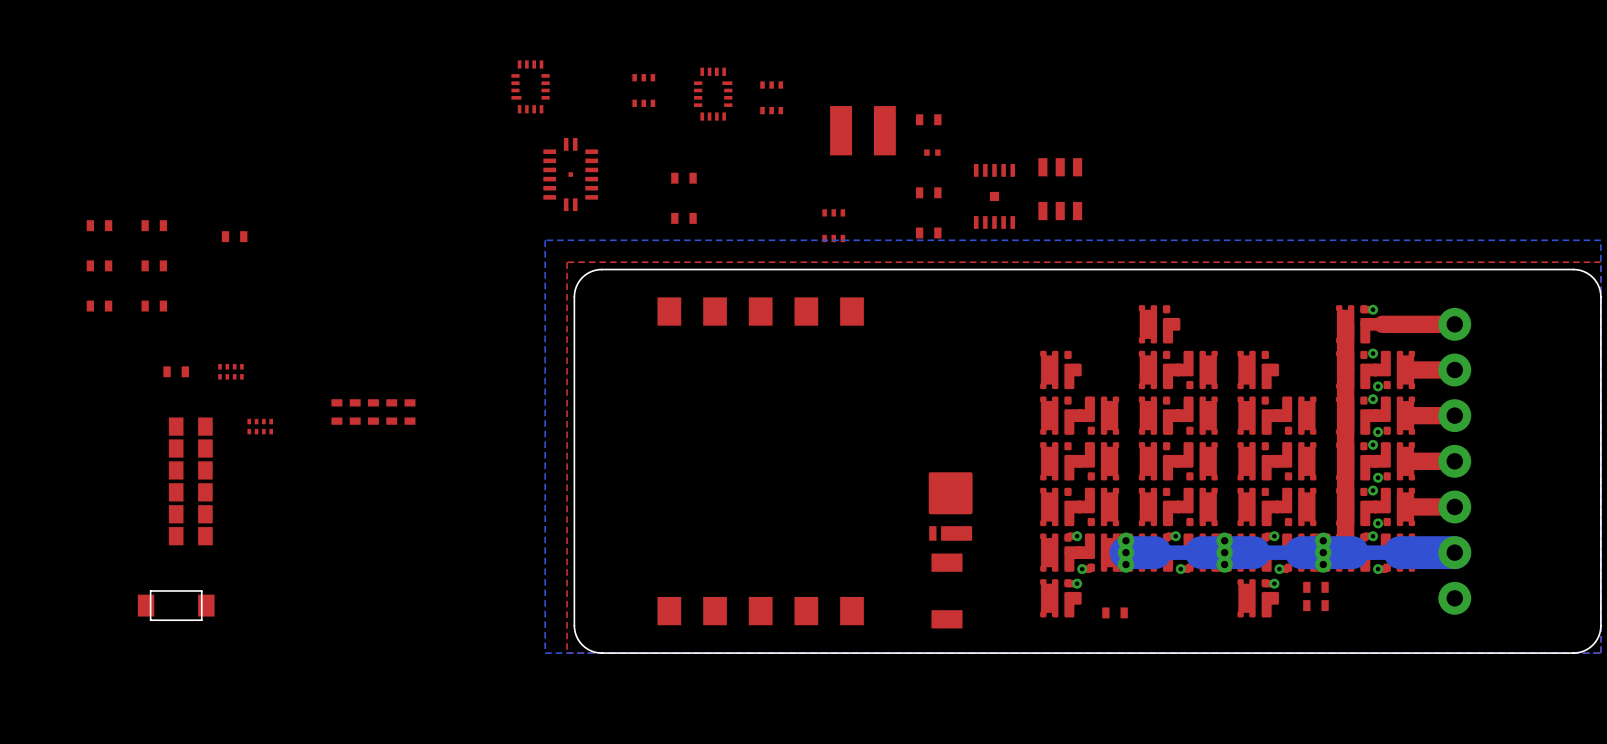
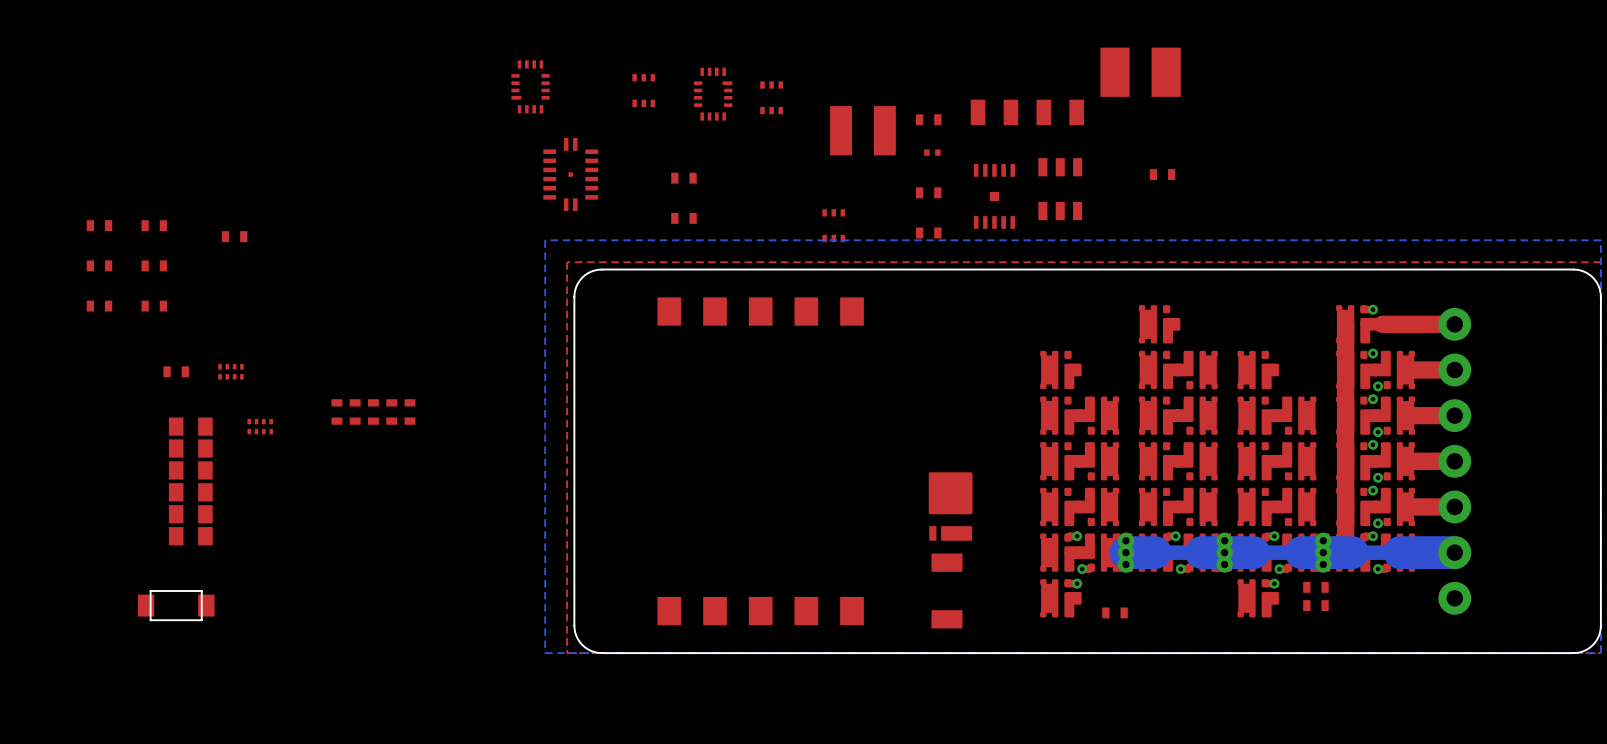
part: none -> (1140, 72)
part: none -> (994, 112)
part: none -> (1060, 112)
part: none -> (1162, 174)

